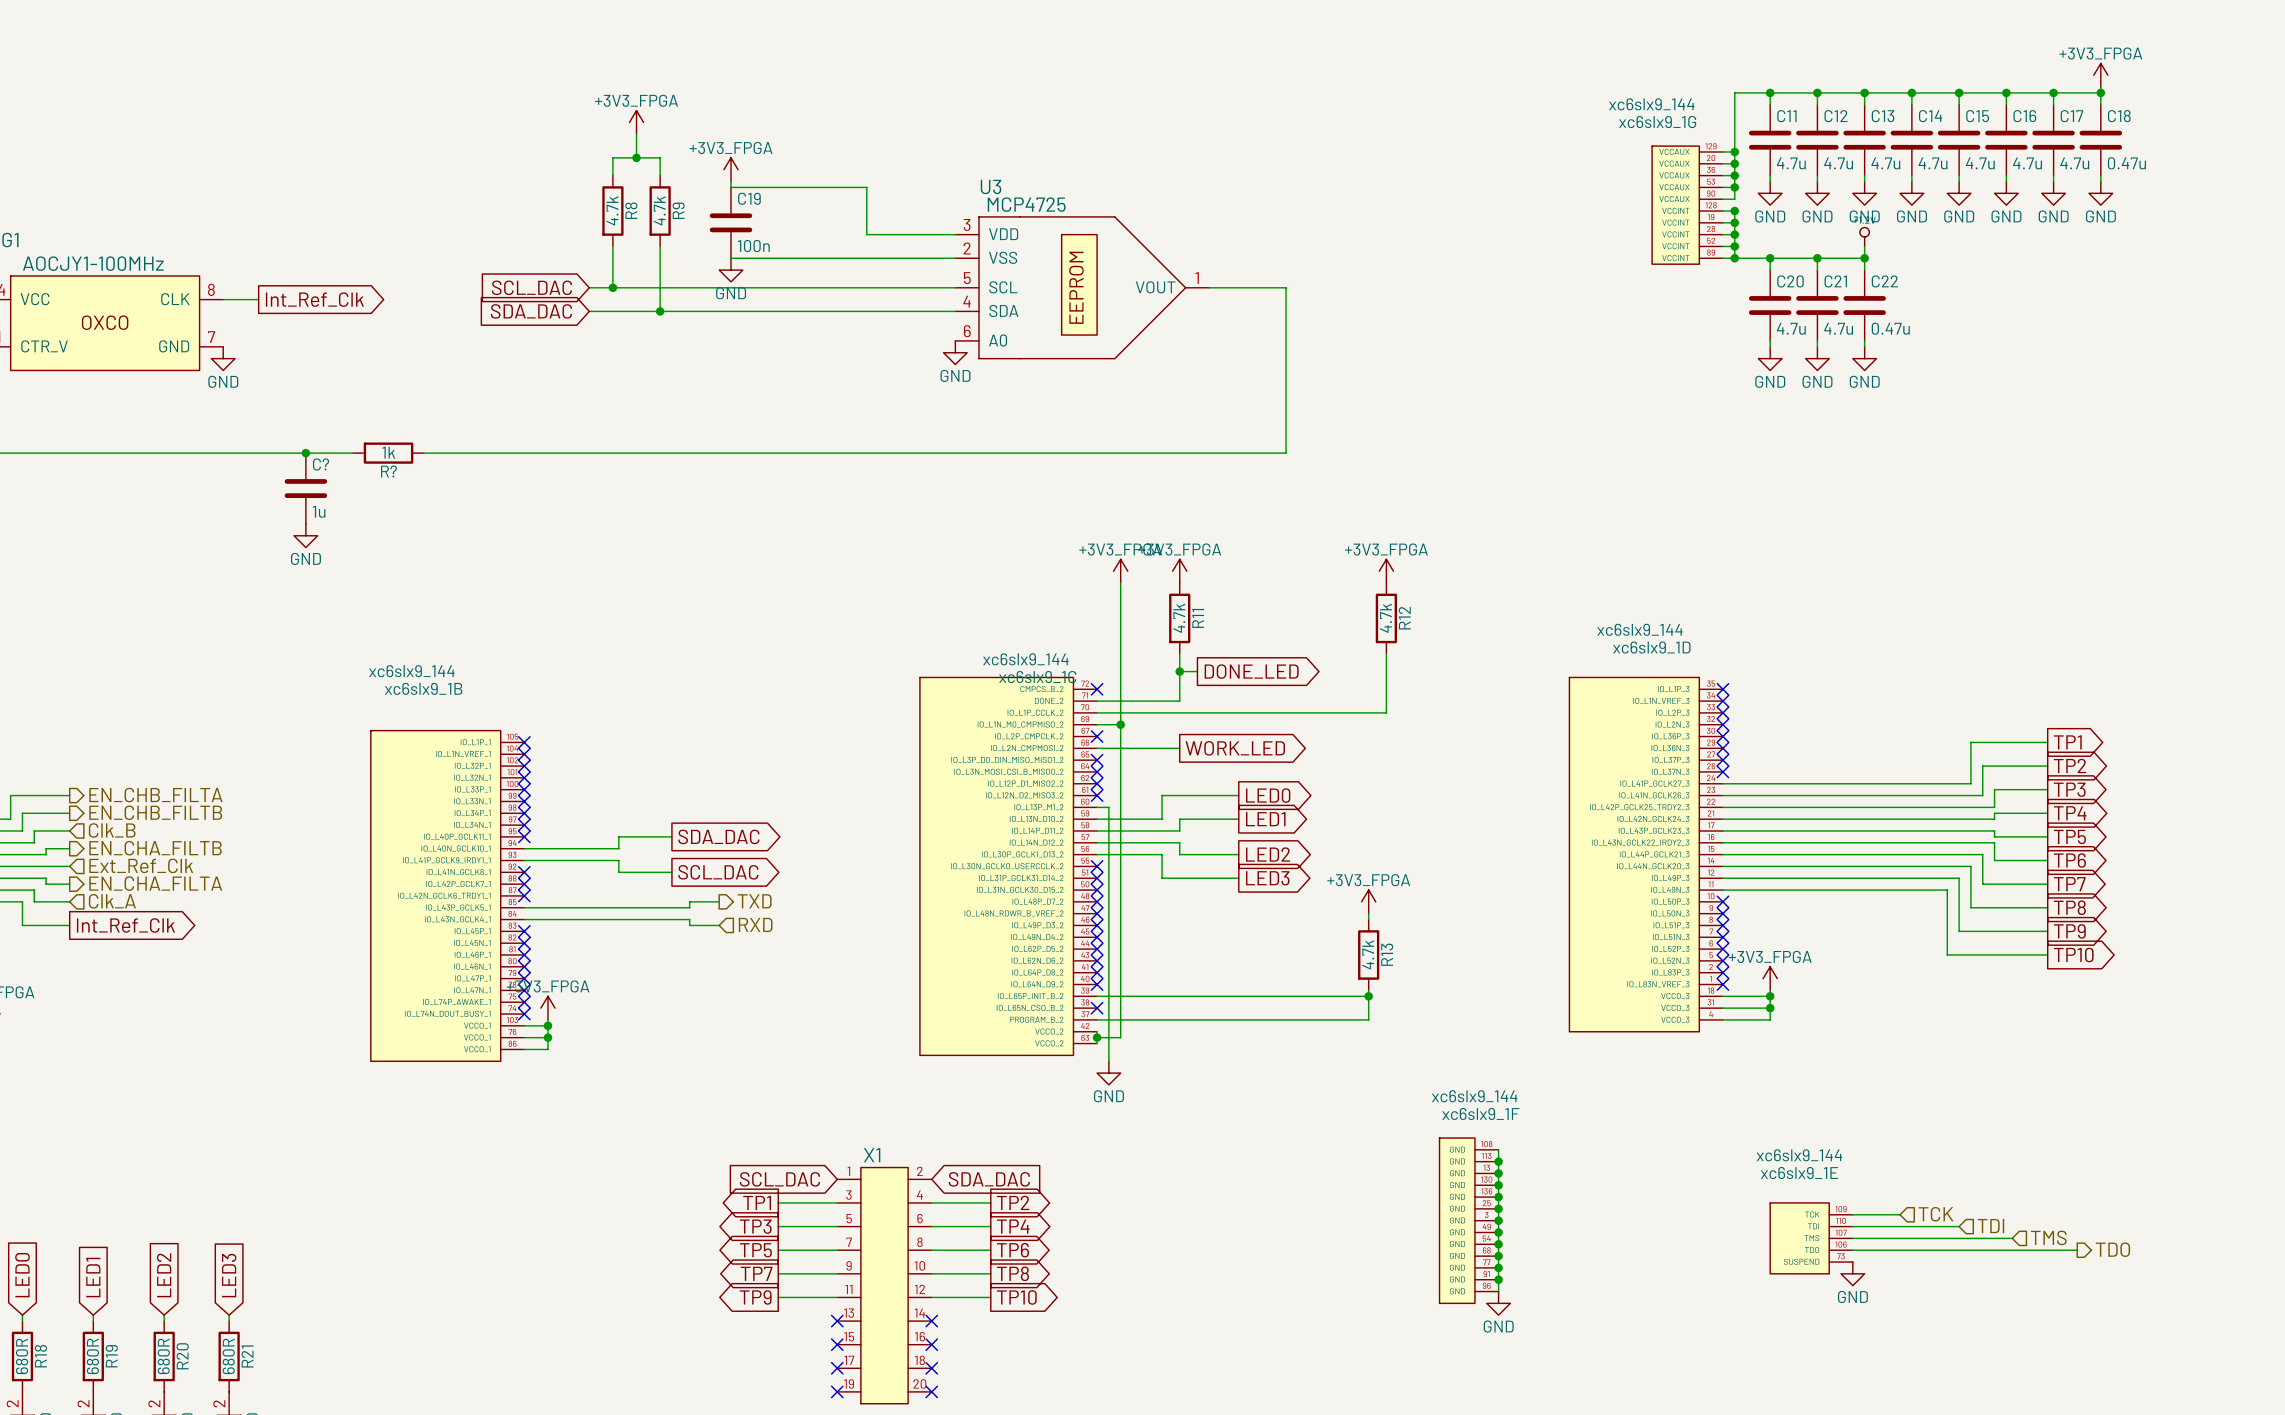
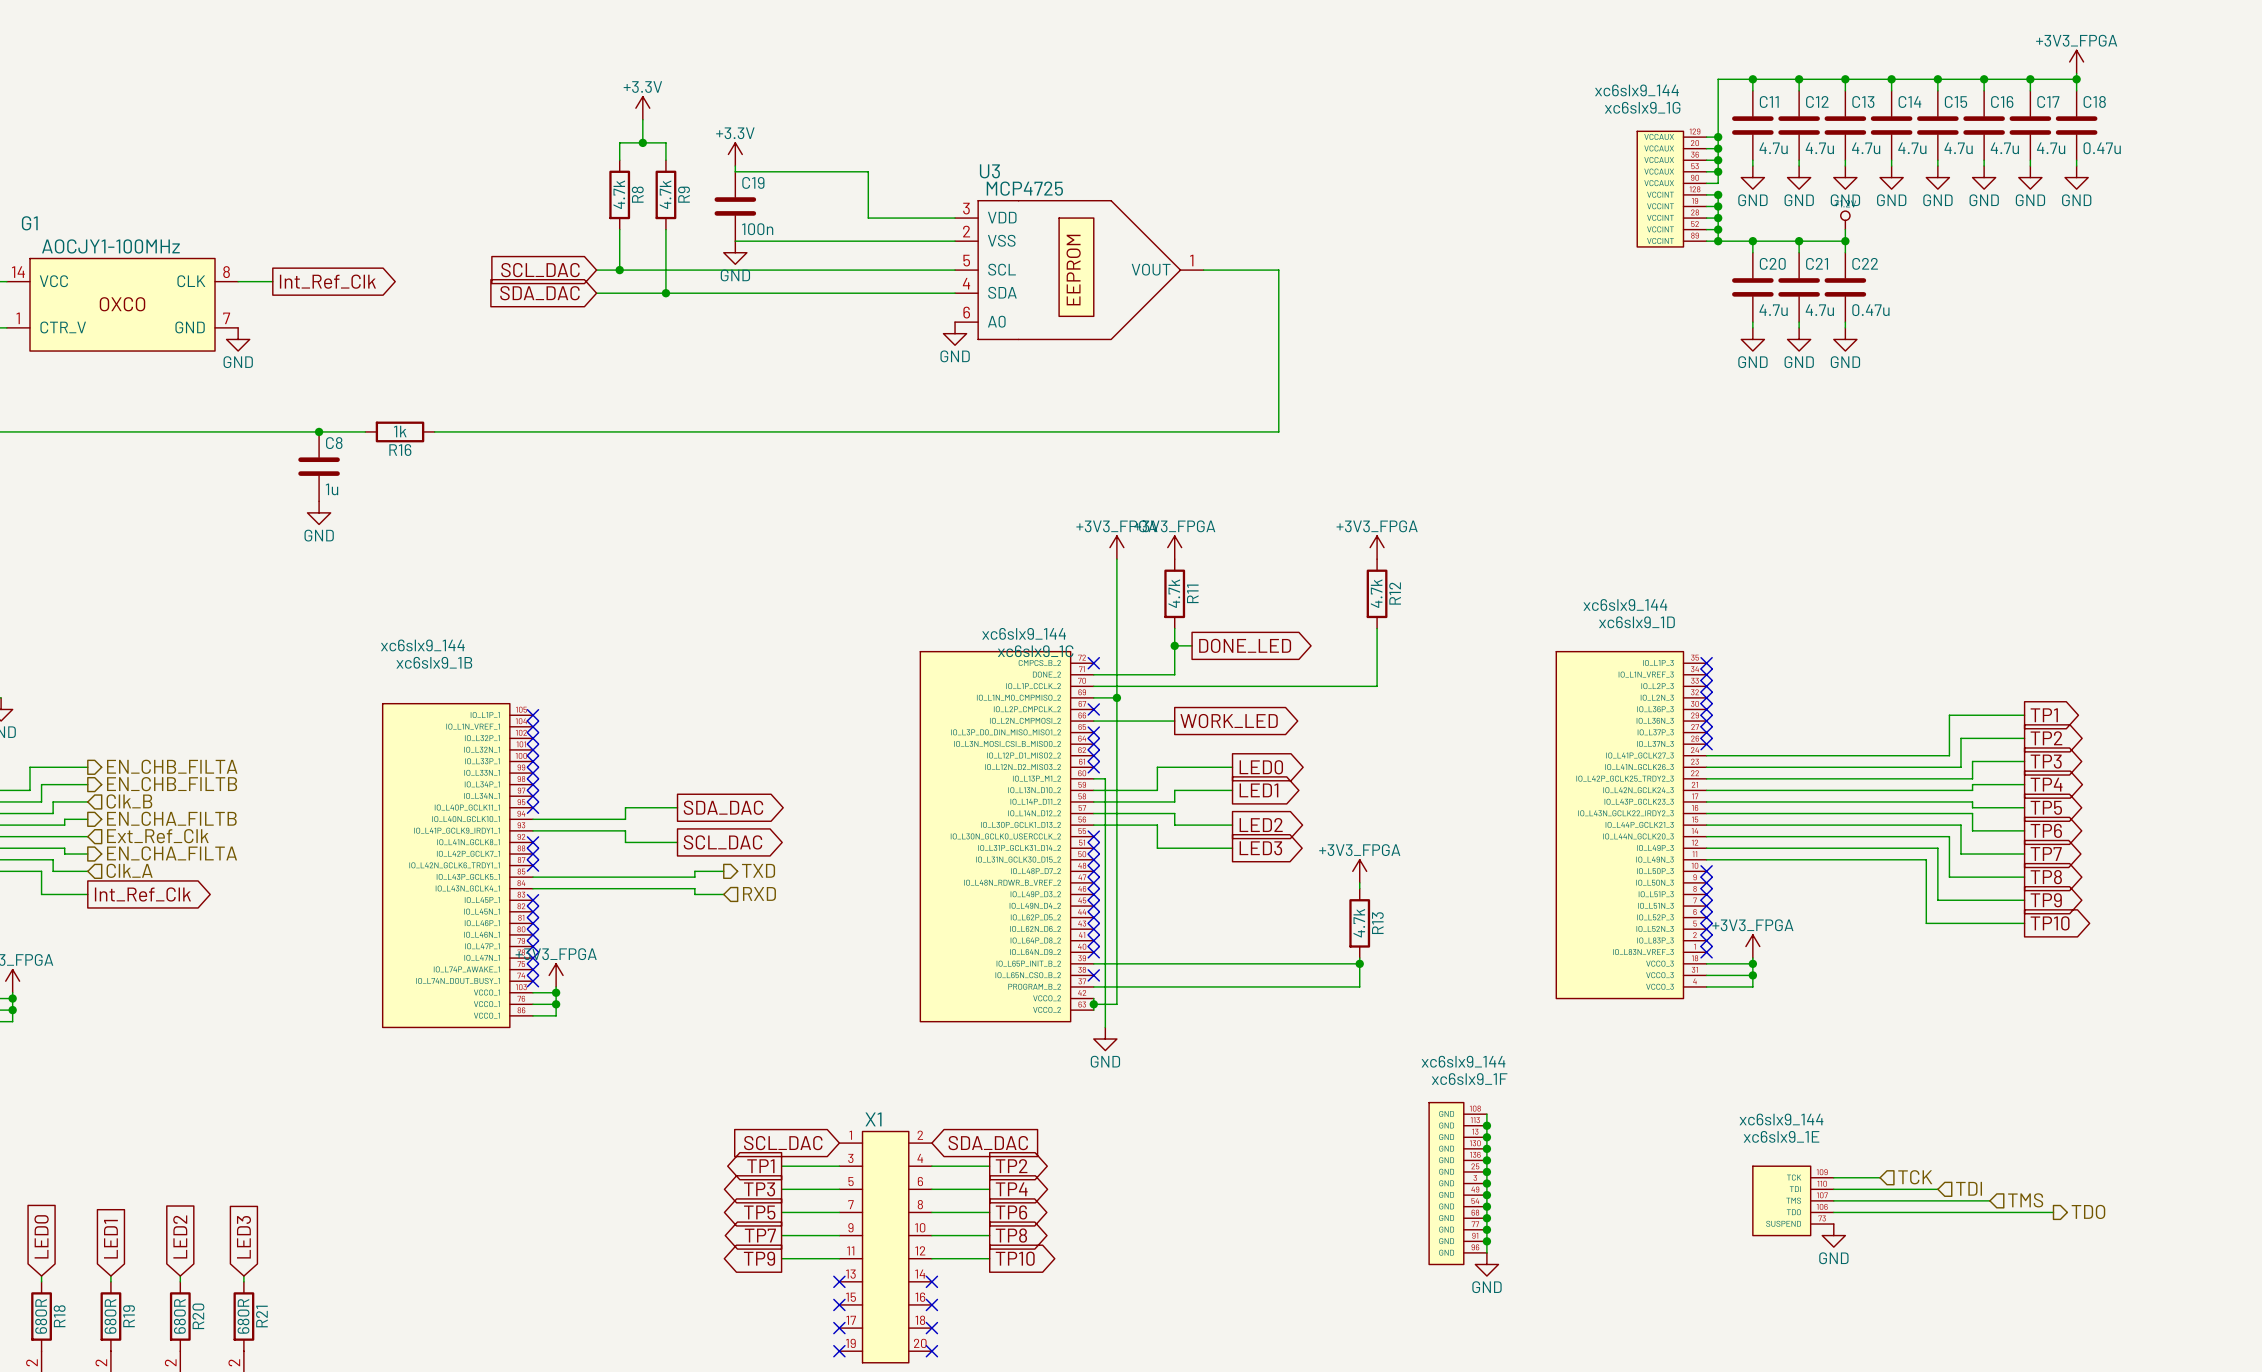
power symbol: +3V3_FPGA (636, 122) -> +3.3V (642, 108)
power symbol: +3V3_FPGA (731, 169) -> +3.3V (735, 154)
C? name: C? (321, 464) -> C8 (334, 443)
R? name: R? (388, 471) -> R16 (400, 450)

